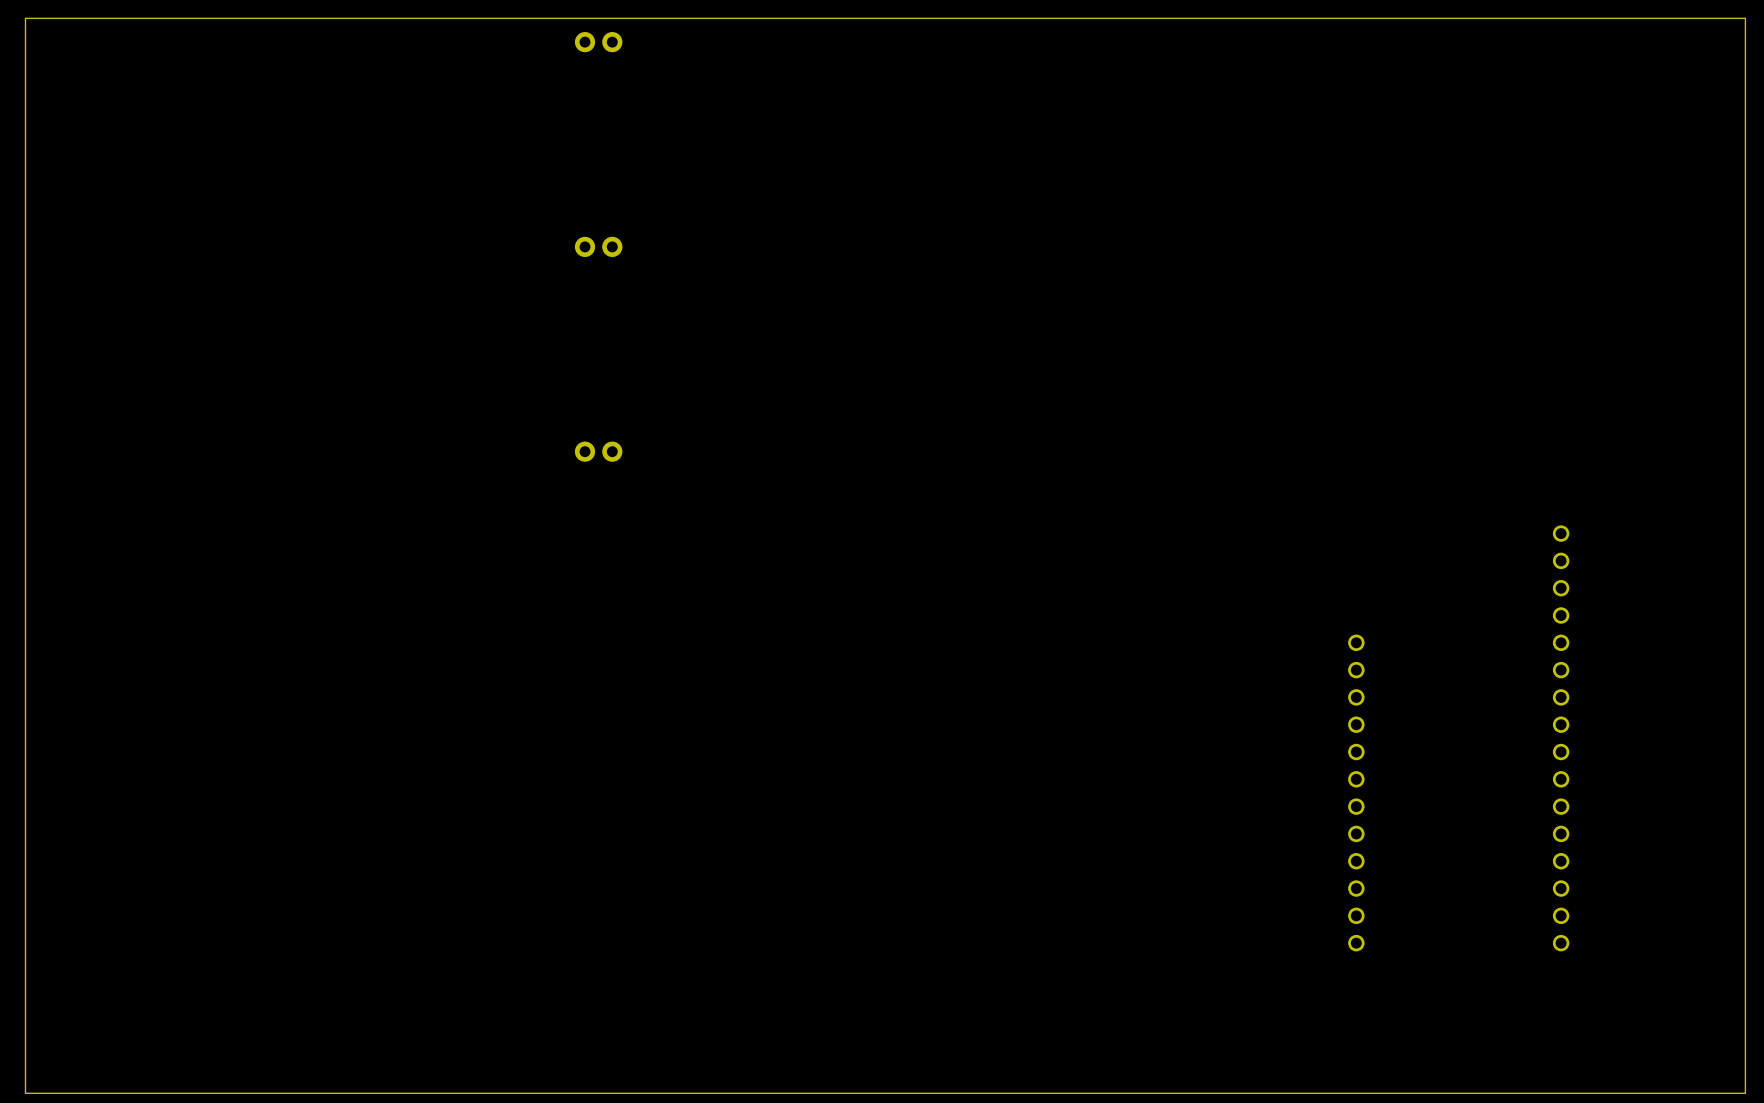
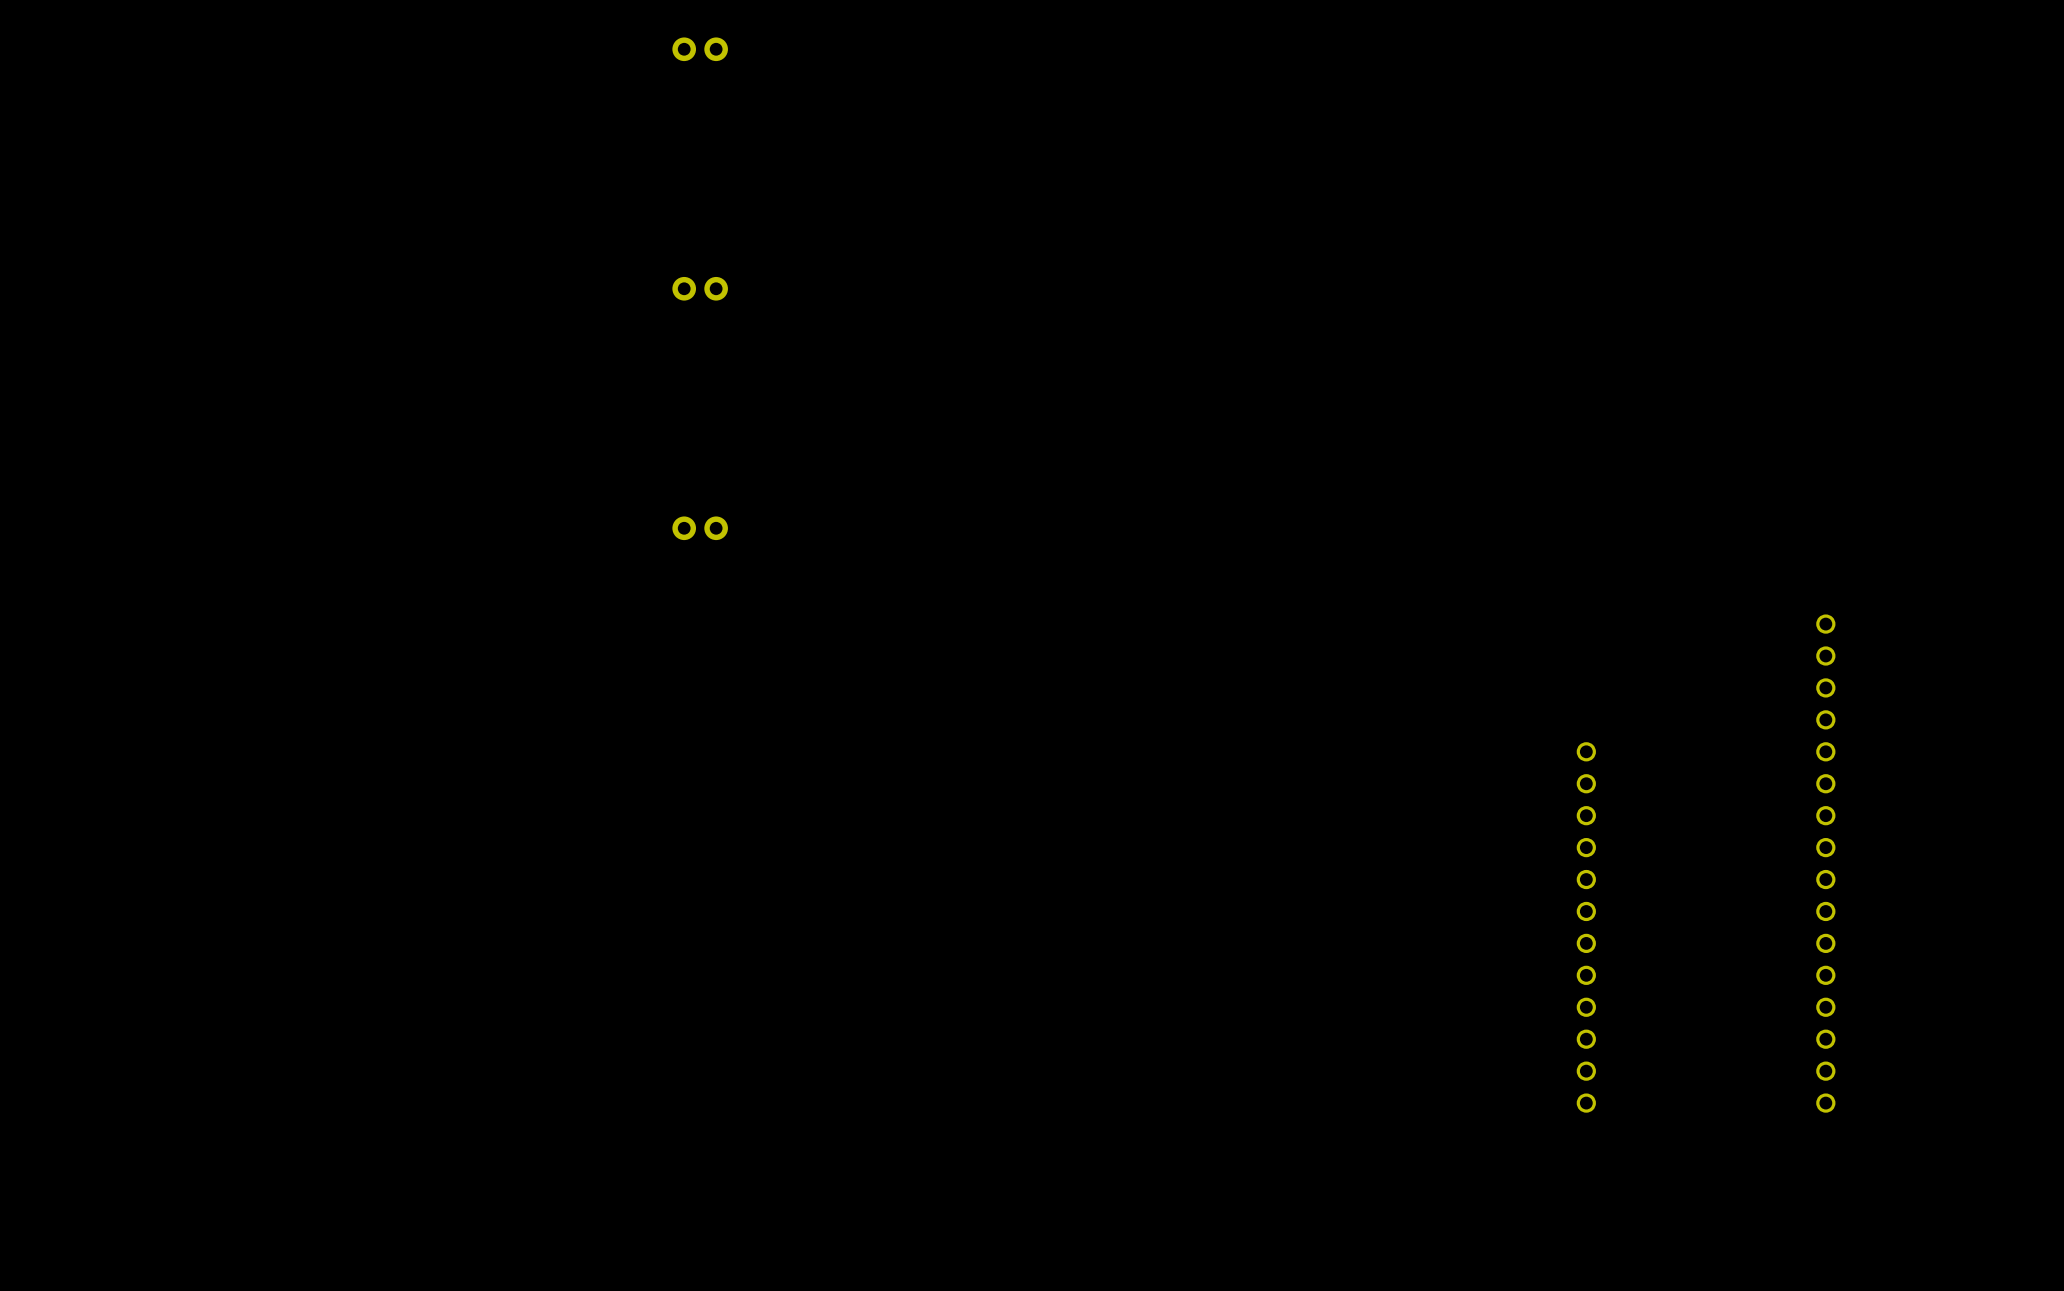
board edge: (1745, 18) (25, 18) (25, 1093) (1745, 1093) (1745, 18) -> none

